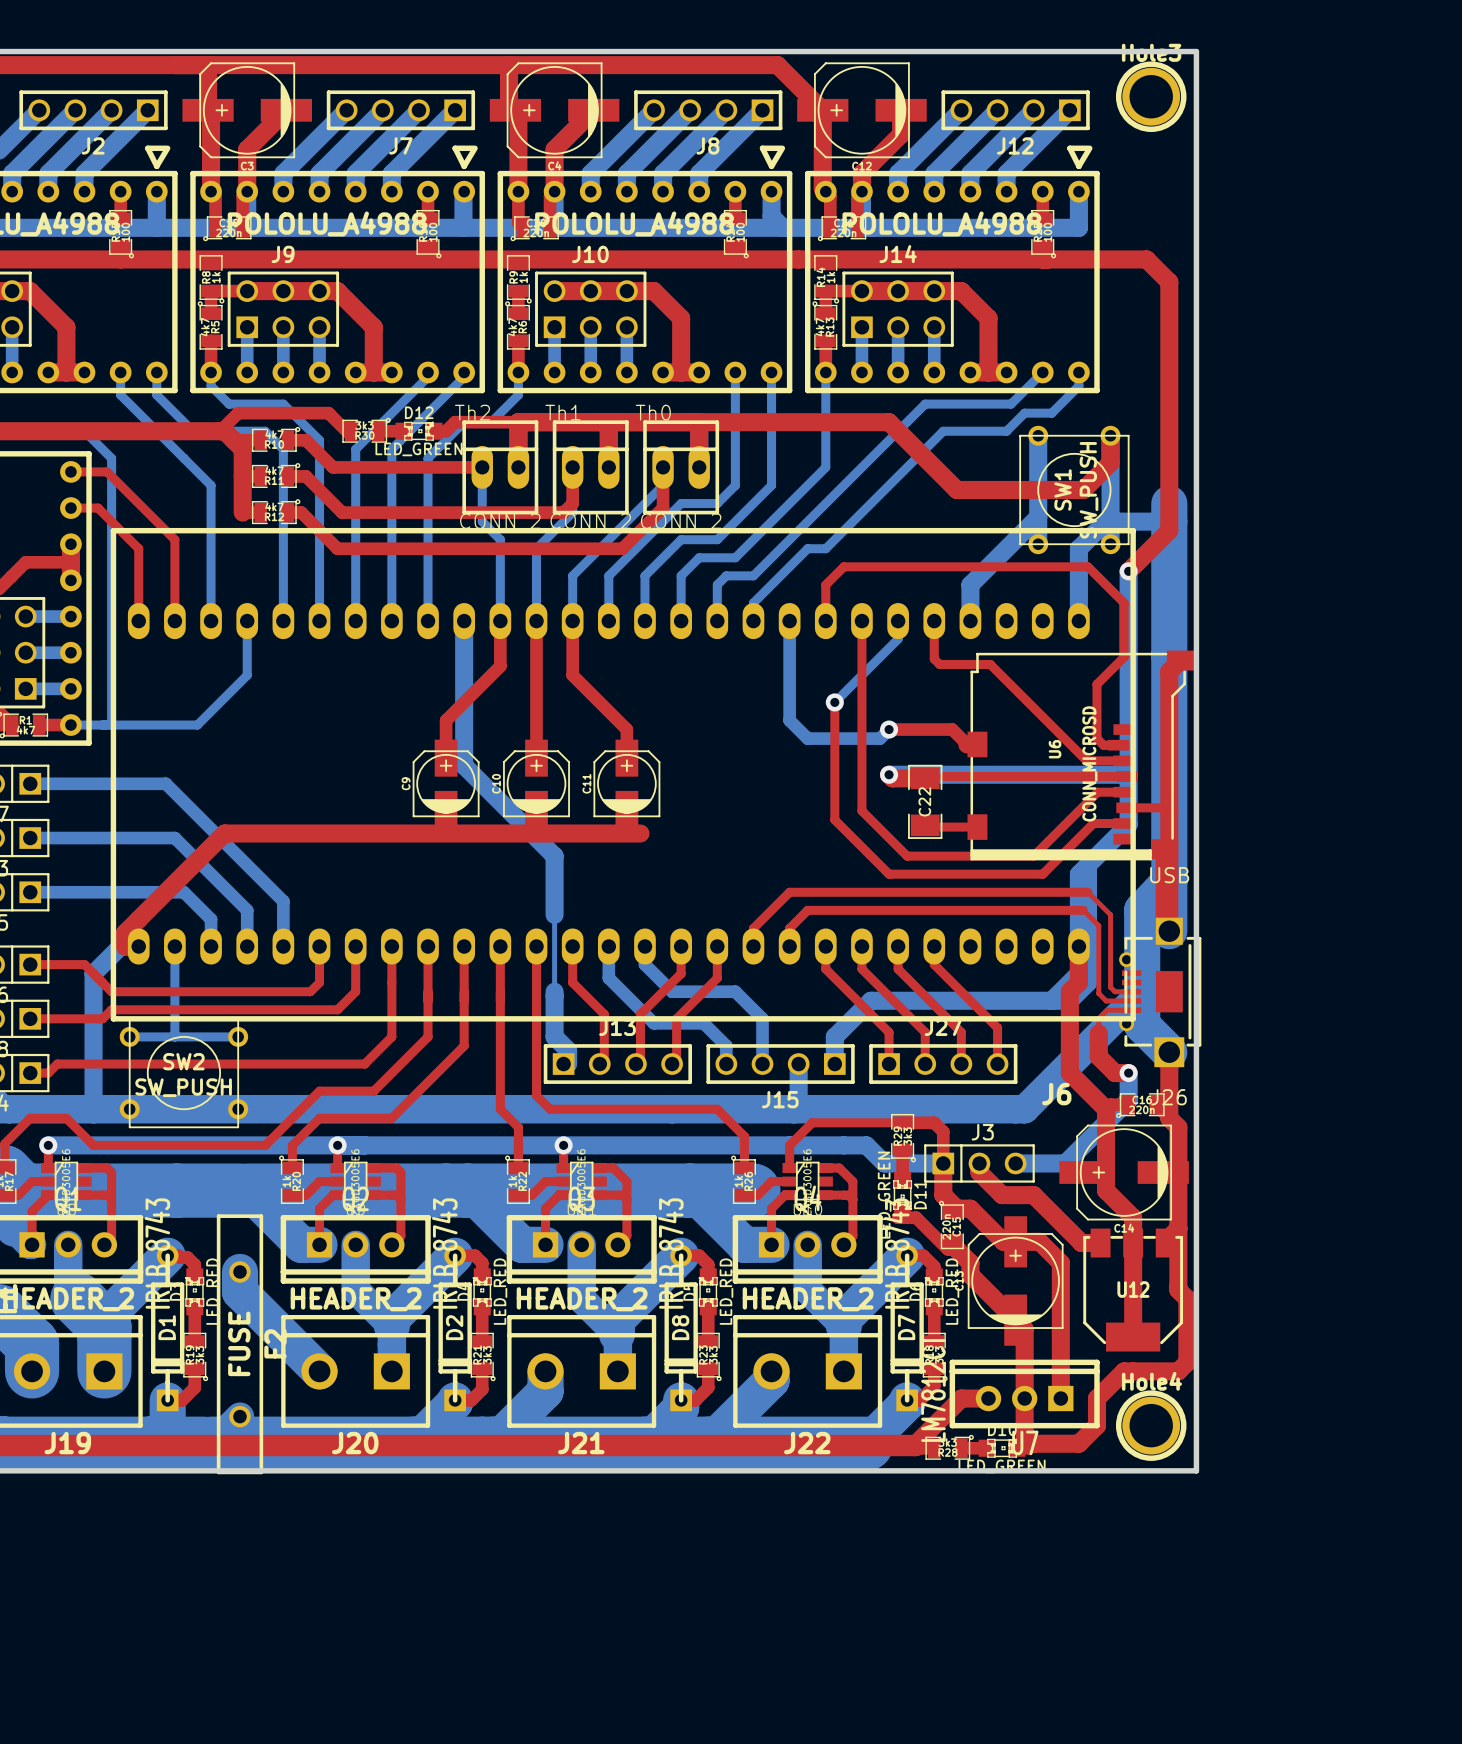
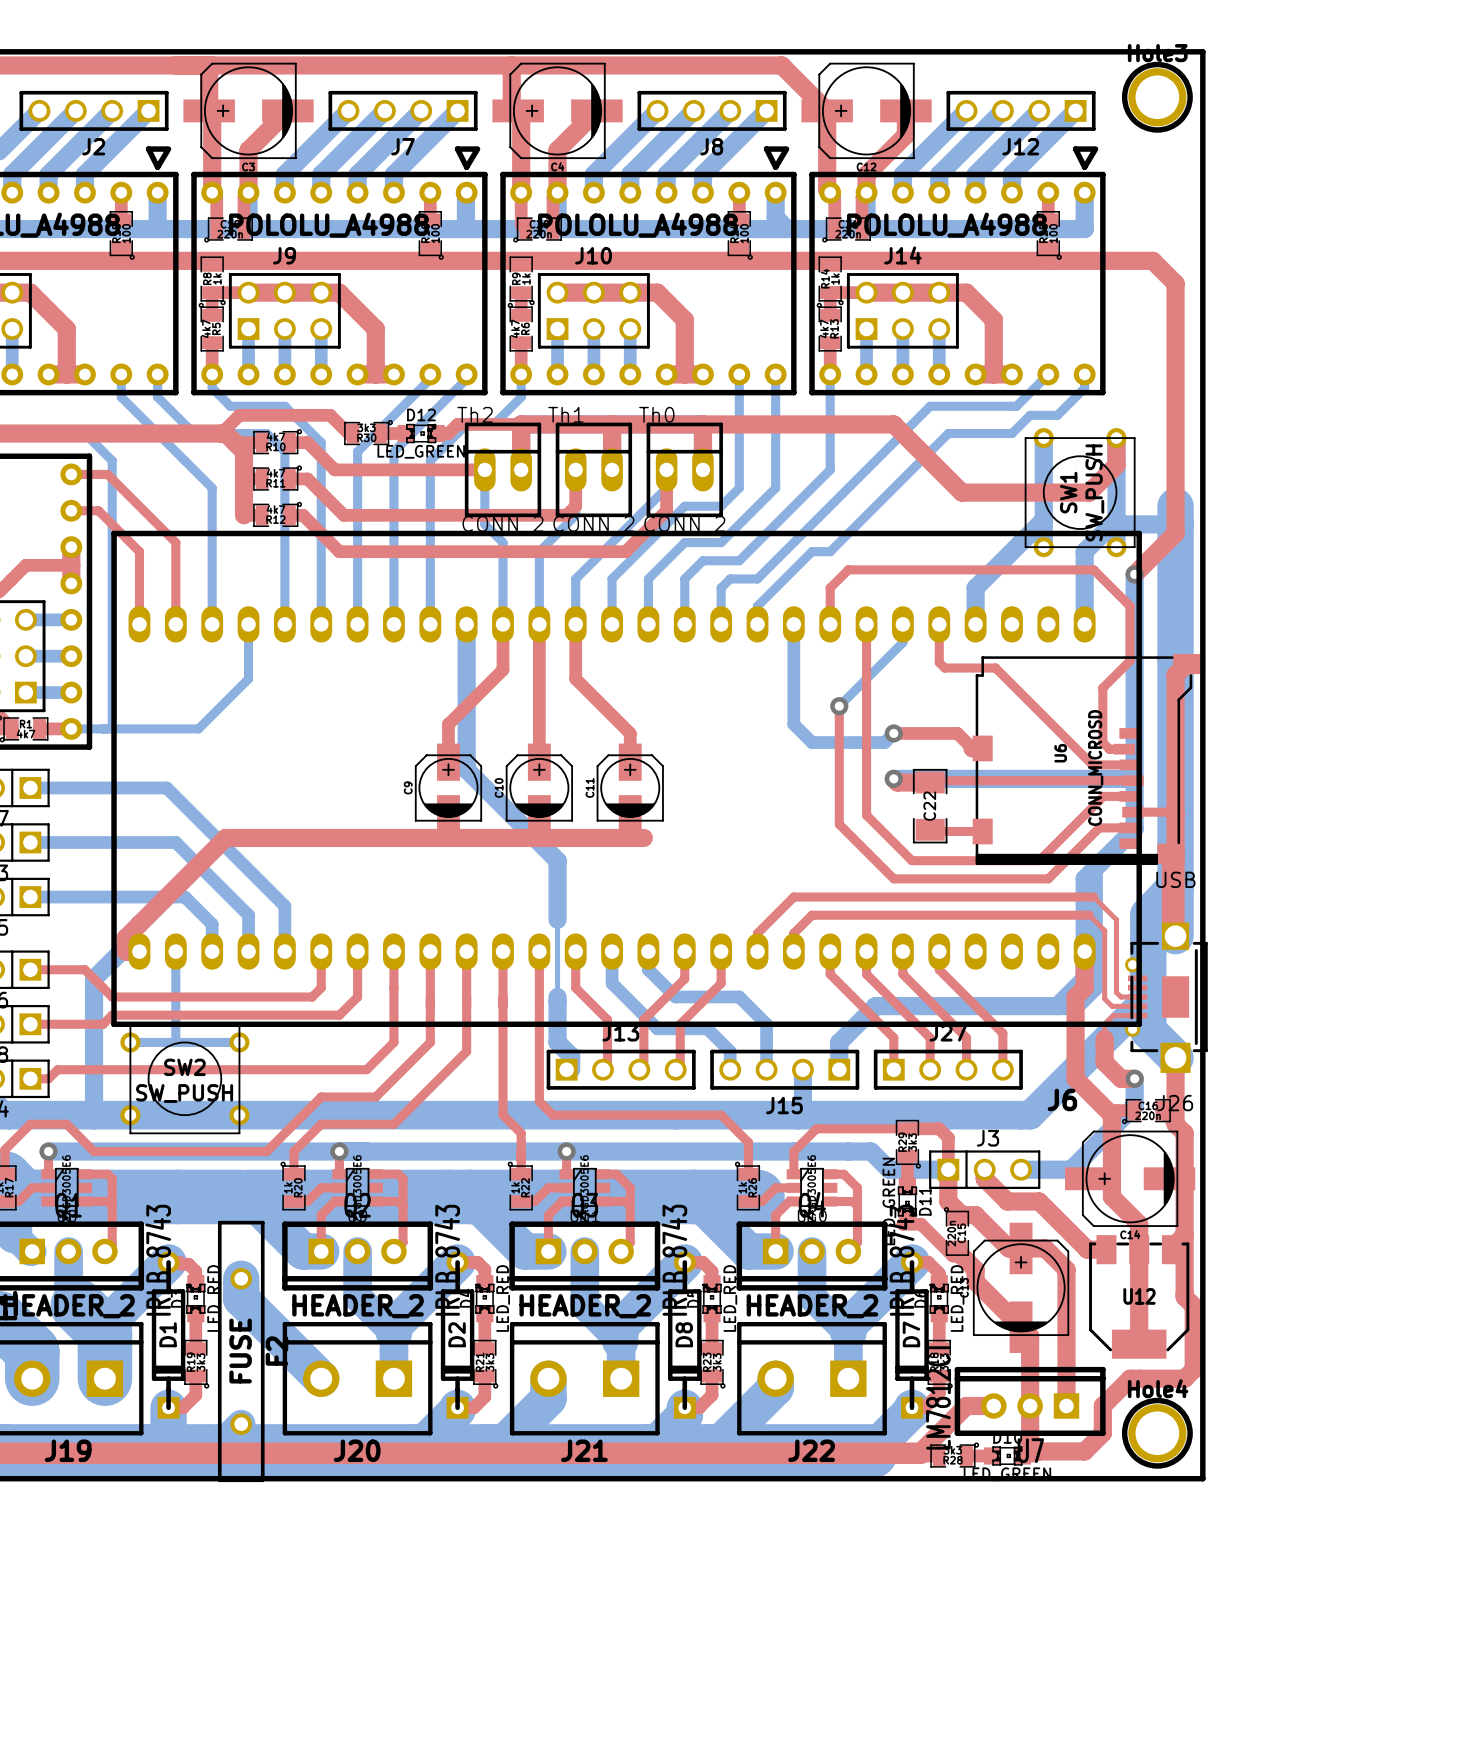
top track: (48, 1195) (32, 1211) (32, 1244) -> none

